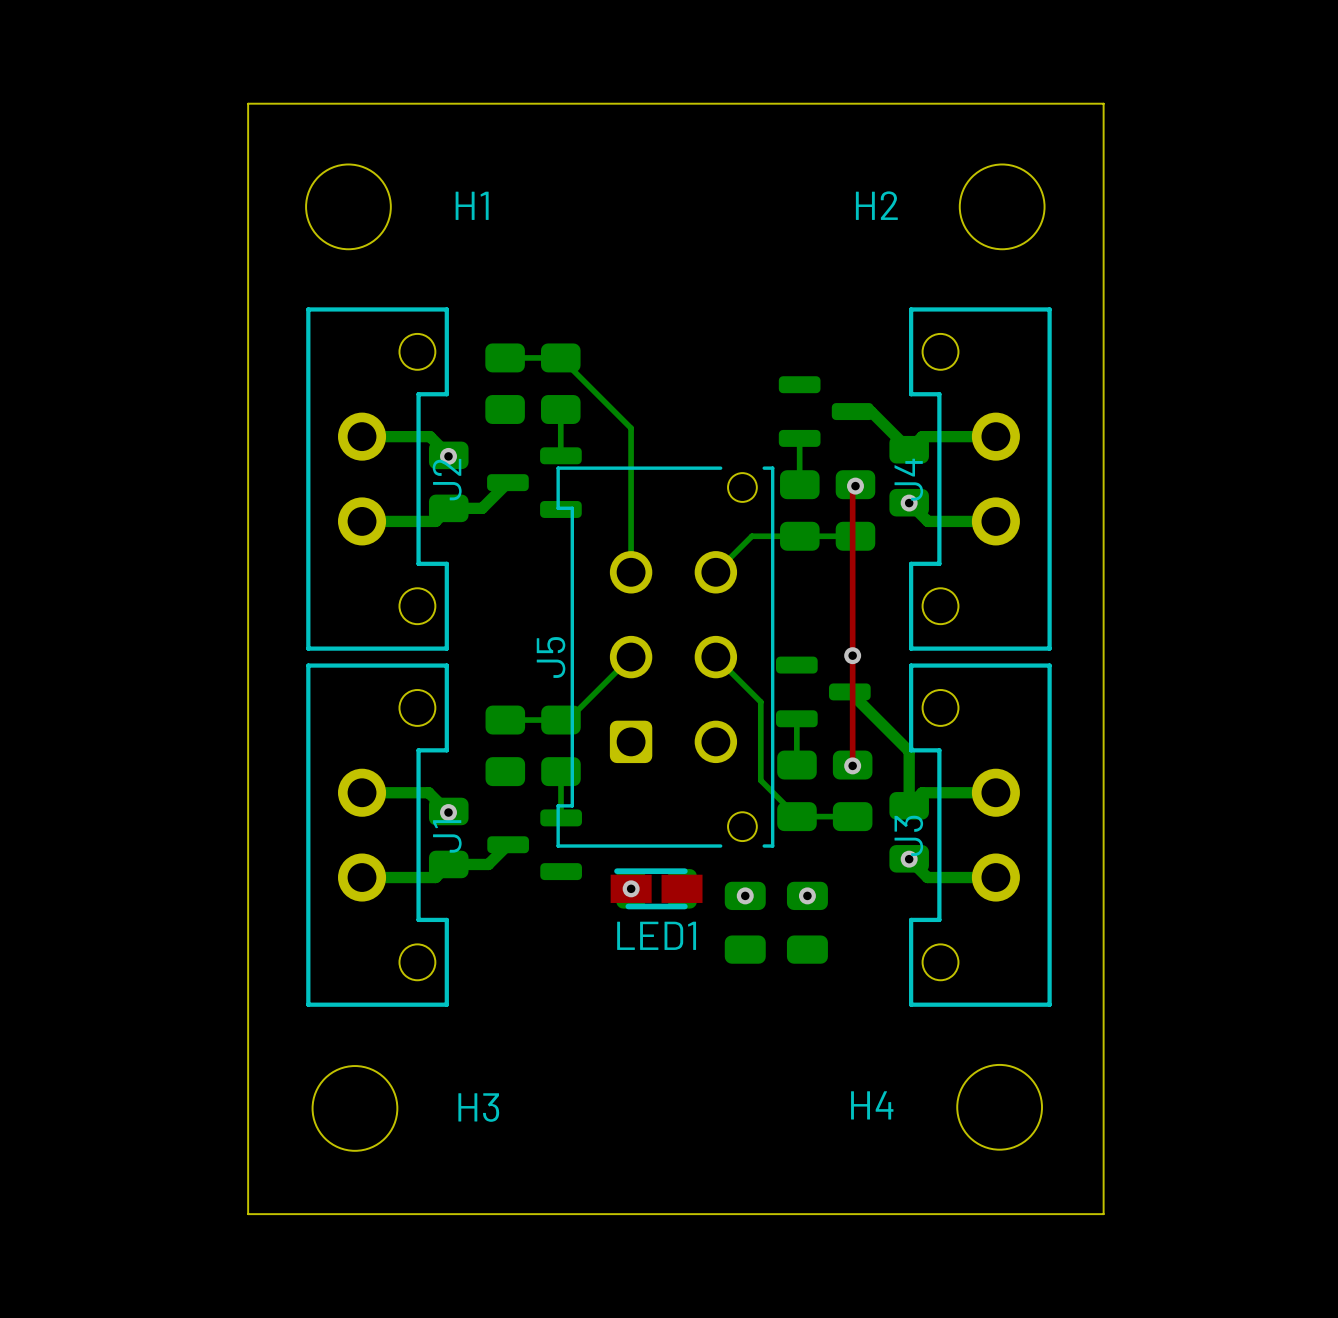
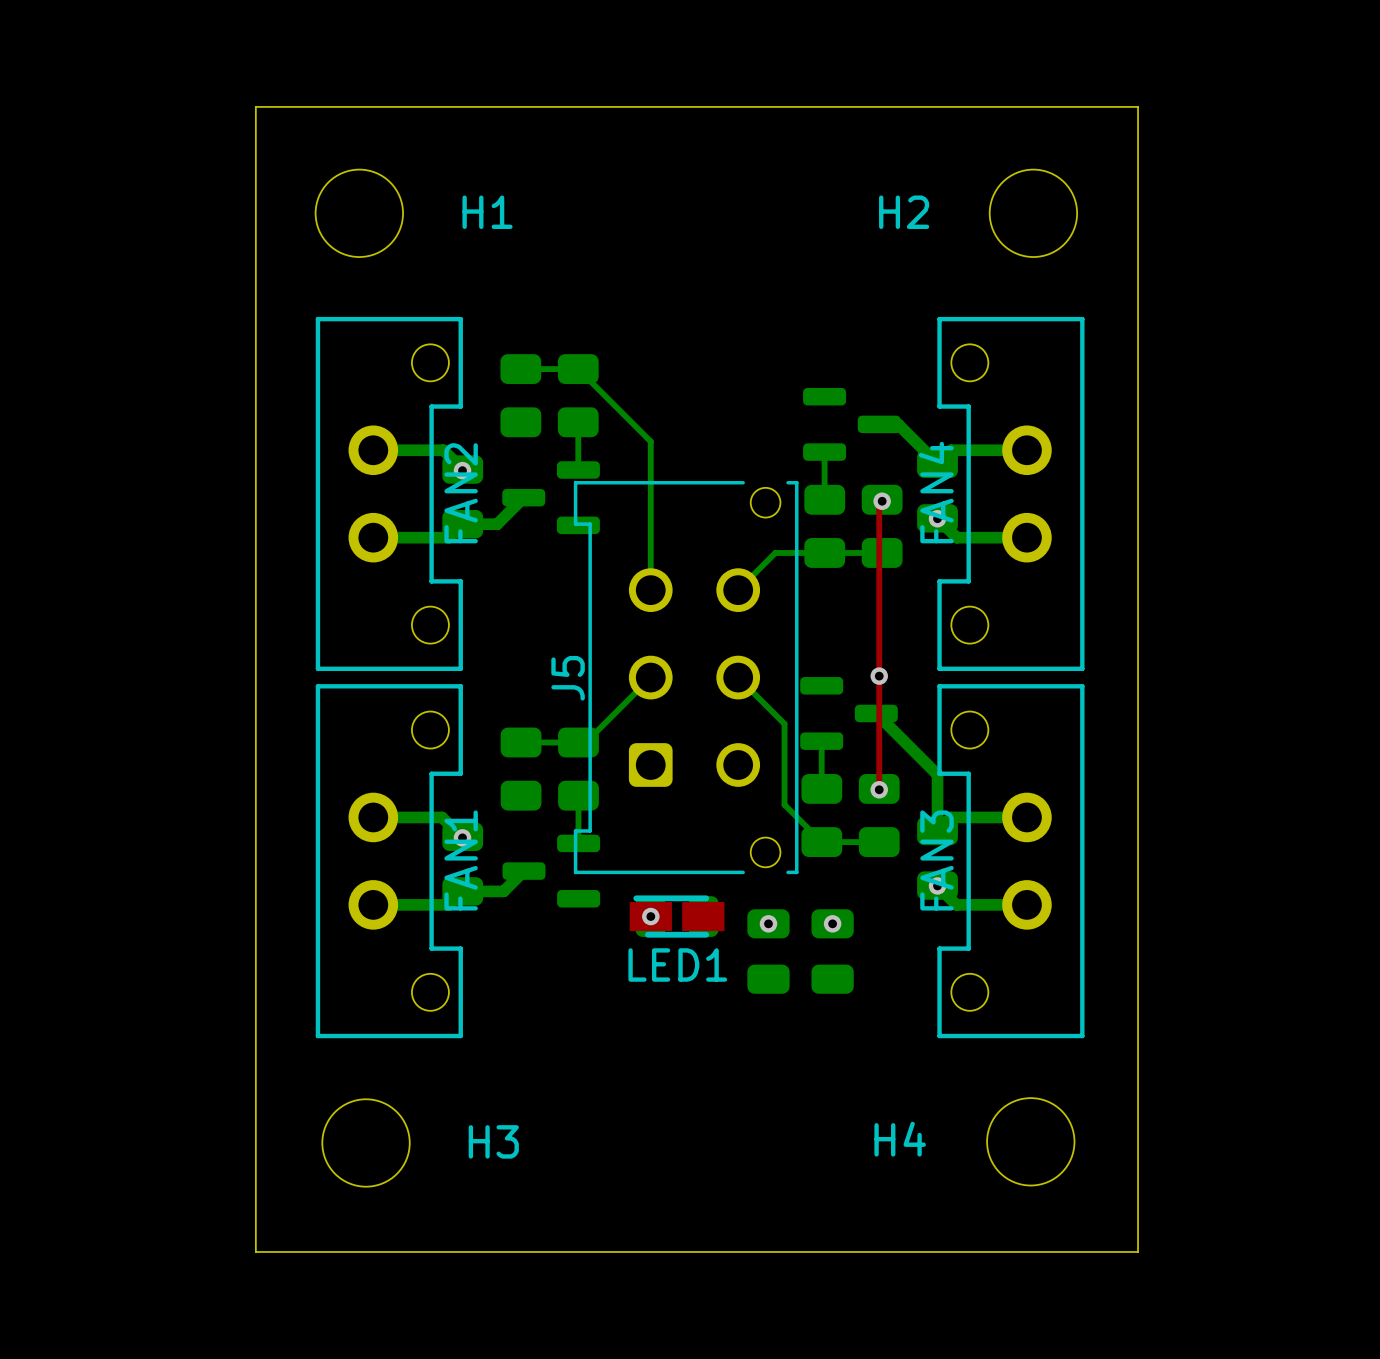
J2 name: J2 (447, 479) -> FAN2 (461, 493)
J4 name: J4 (908, 479) -> FAN4 (936, 492)
J3 name: J3 (908, 835) -> FAN3 (936, 860)
J1 name: J1 (447, 836) -> FAN1 (461, 860)

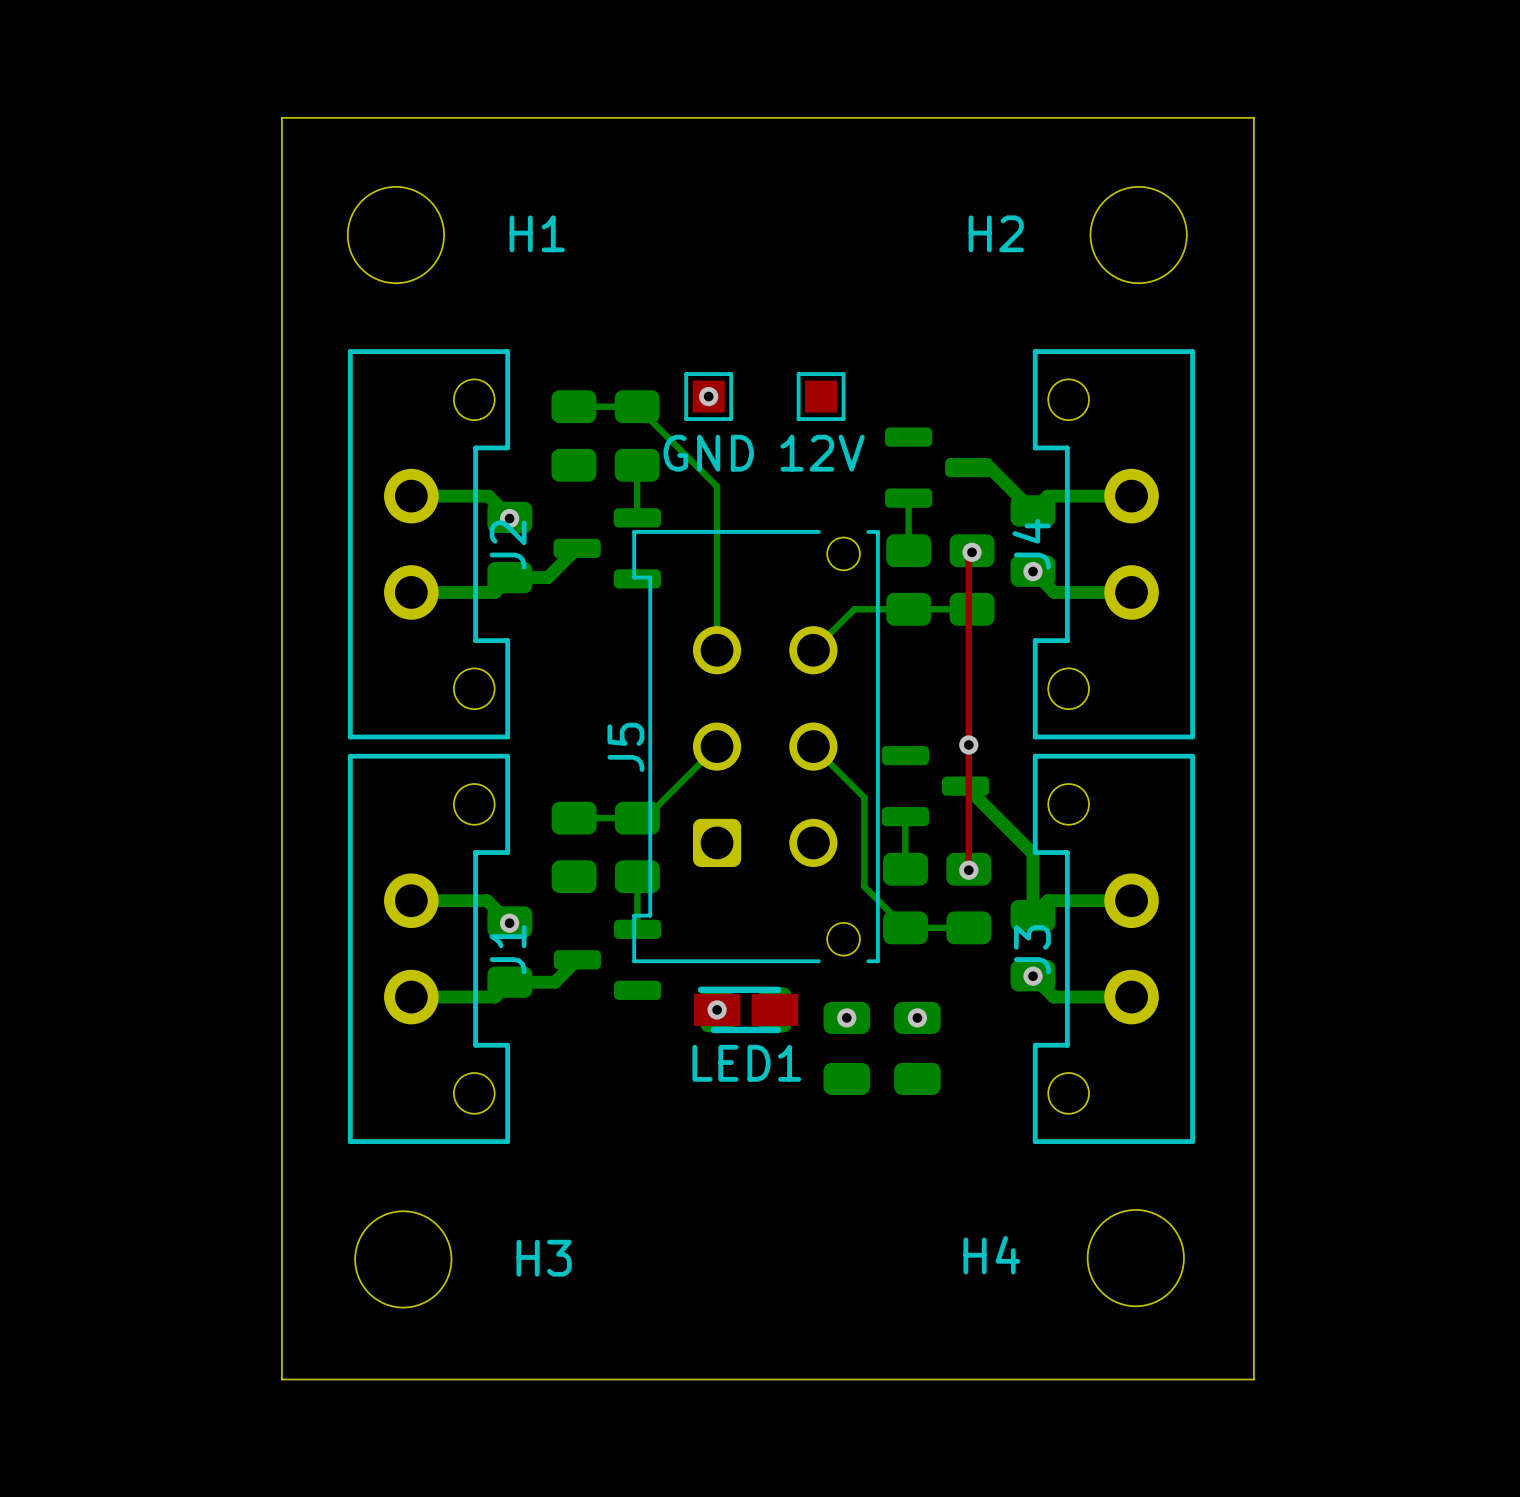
GND: none -> (708, 396)
via: none -> (708, 396)
12V: none -> (821, 396)
FAN4 name: FAN4 (936, 492) -> J4 (1031, 544)
FAN2 name: FAN2 (461, 493) -> J2 (508, 545)
FAN1 name: FAN1 (461, 860) -> J1 (508, 949)
FAN3 name: FAN3 (936, 860) -> J3 (1032, 949)

